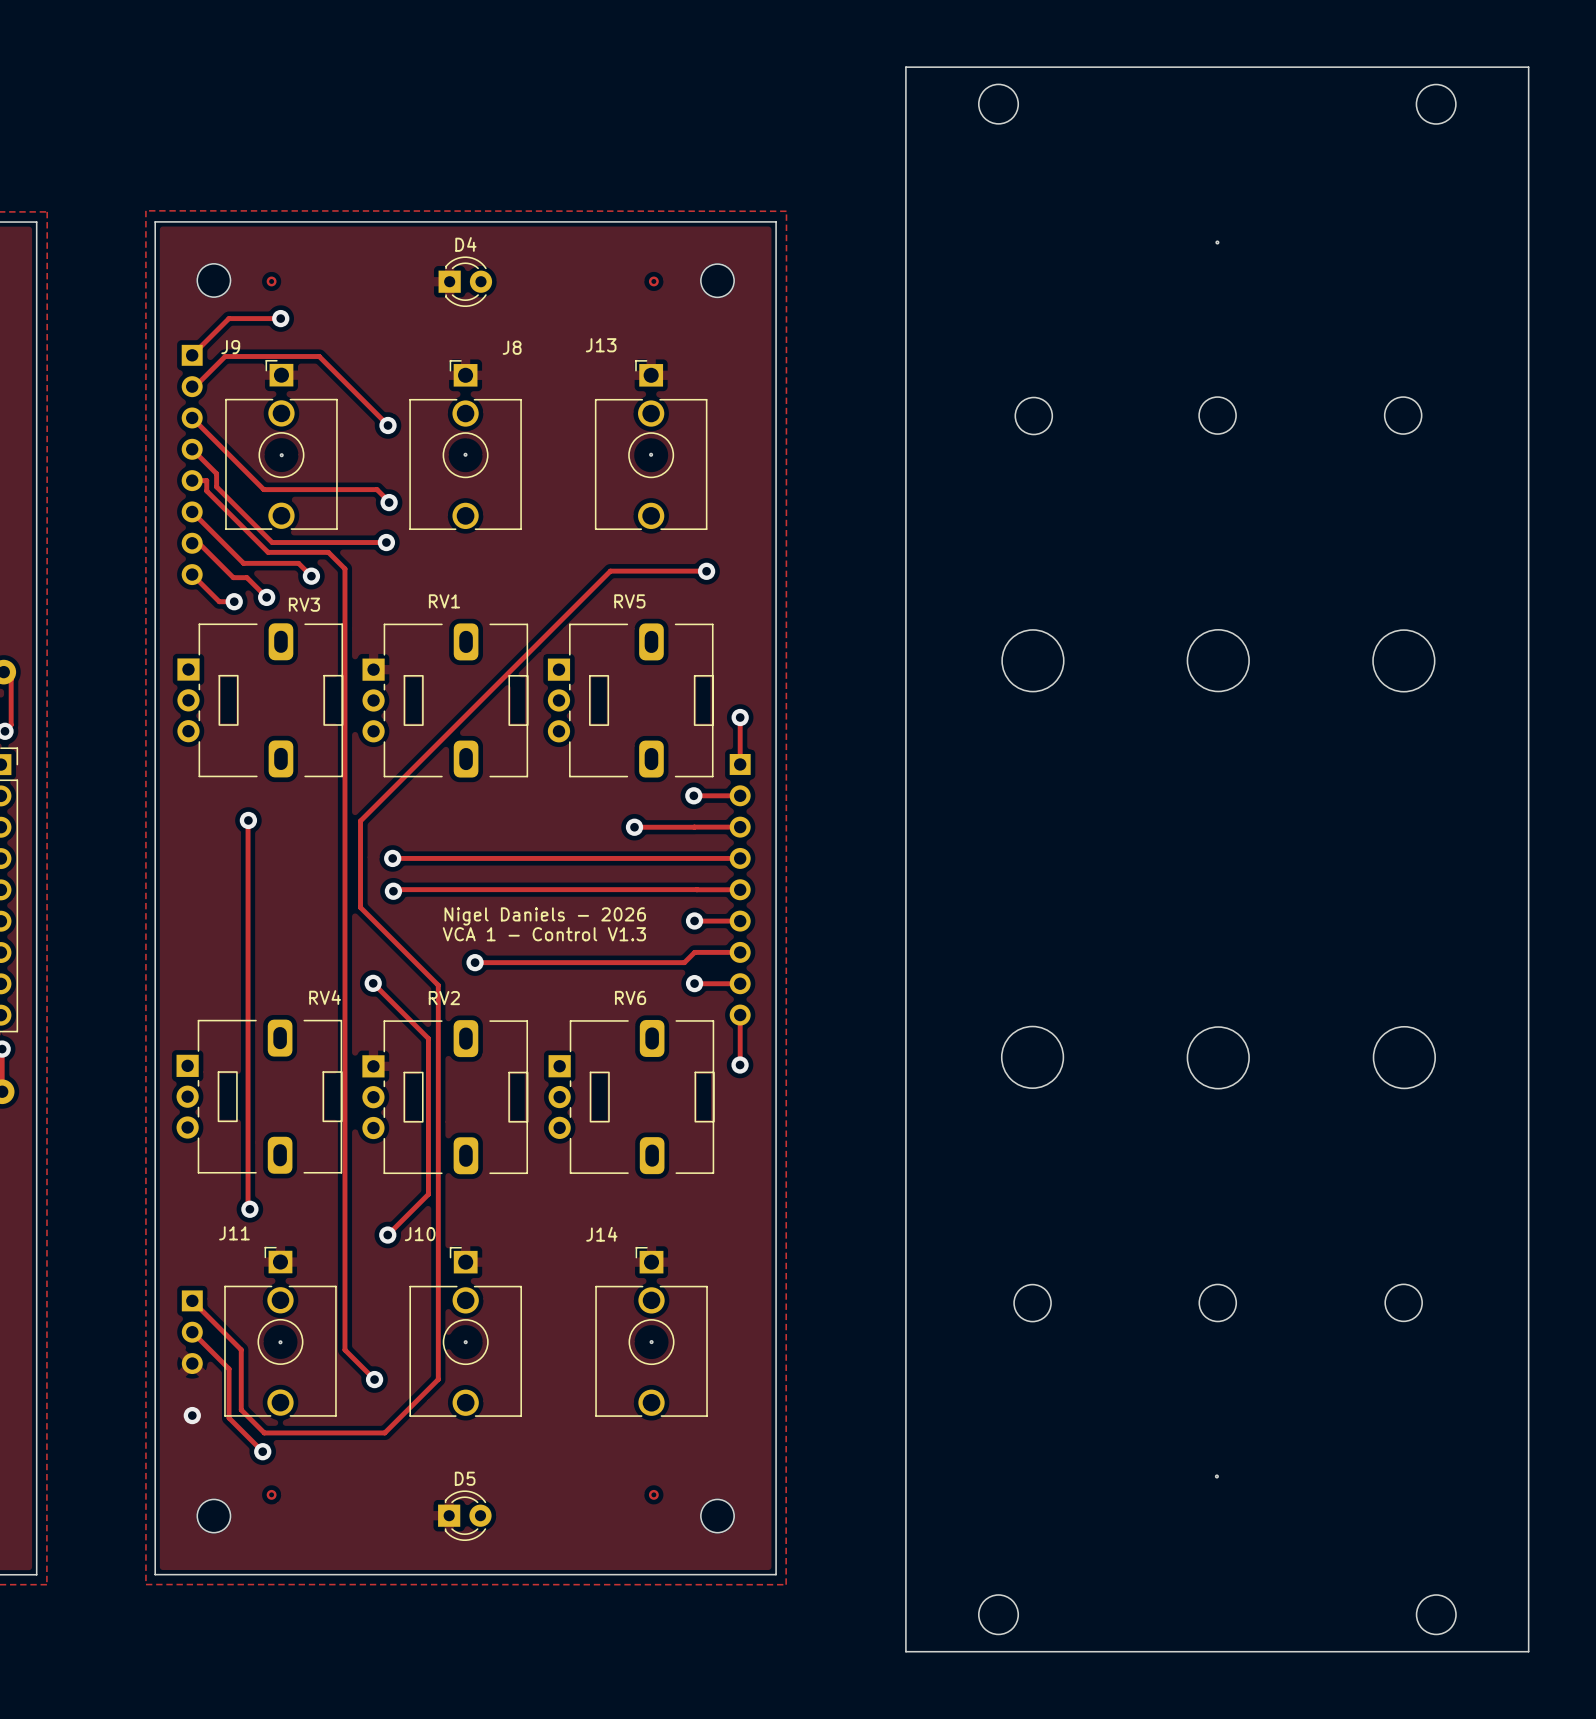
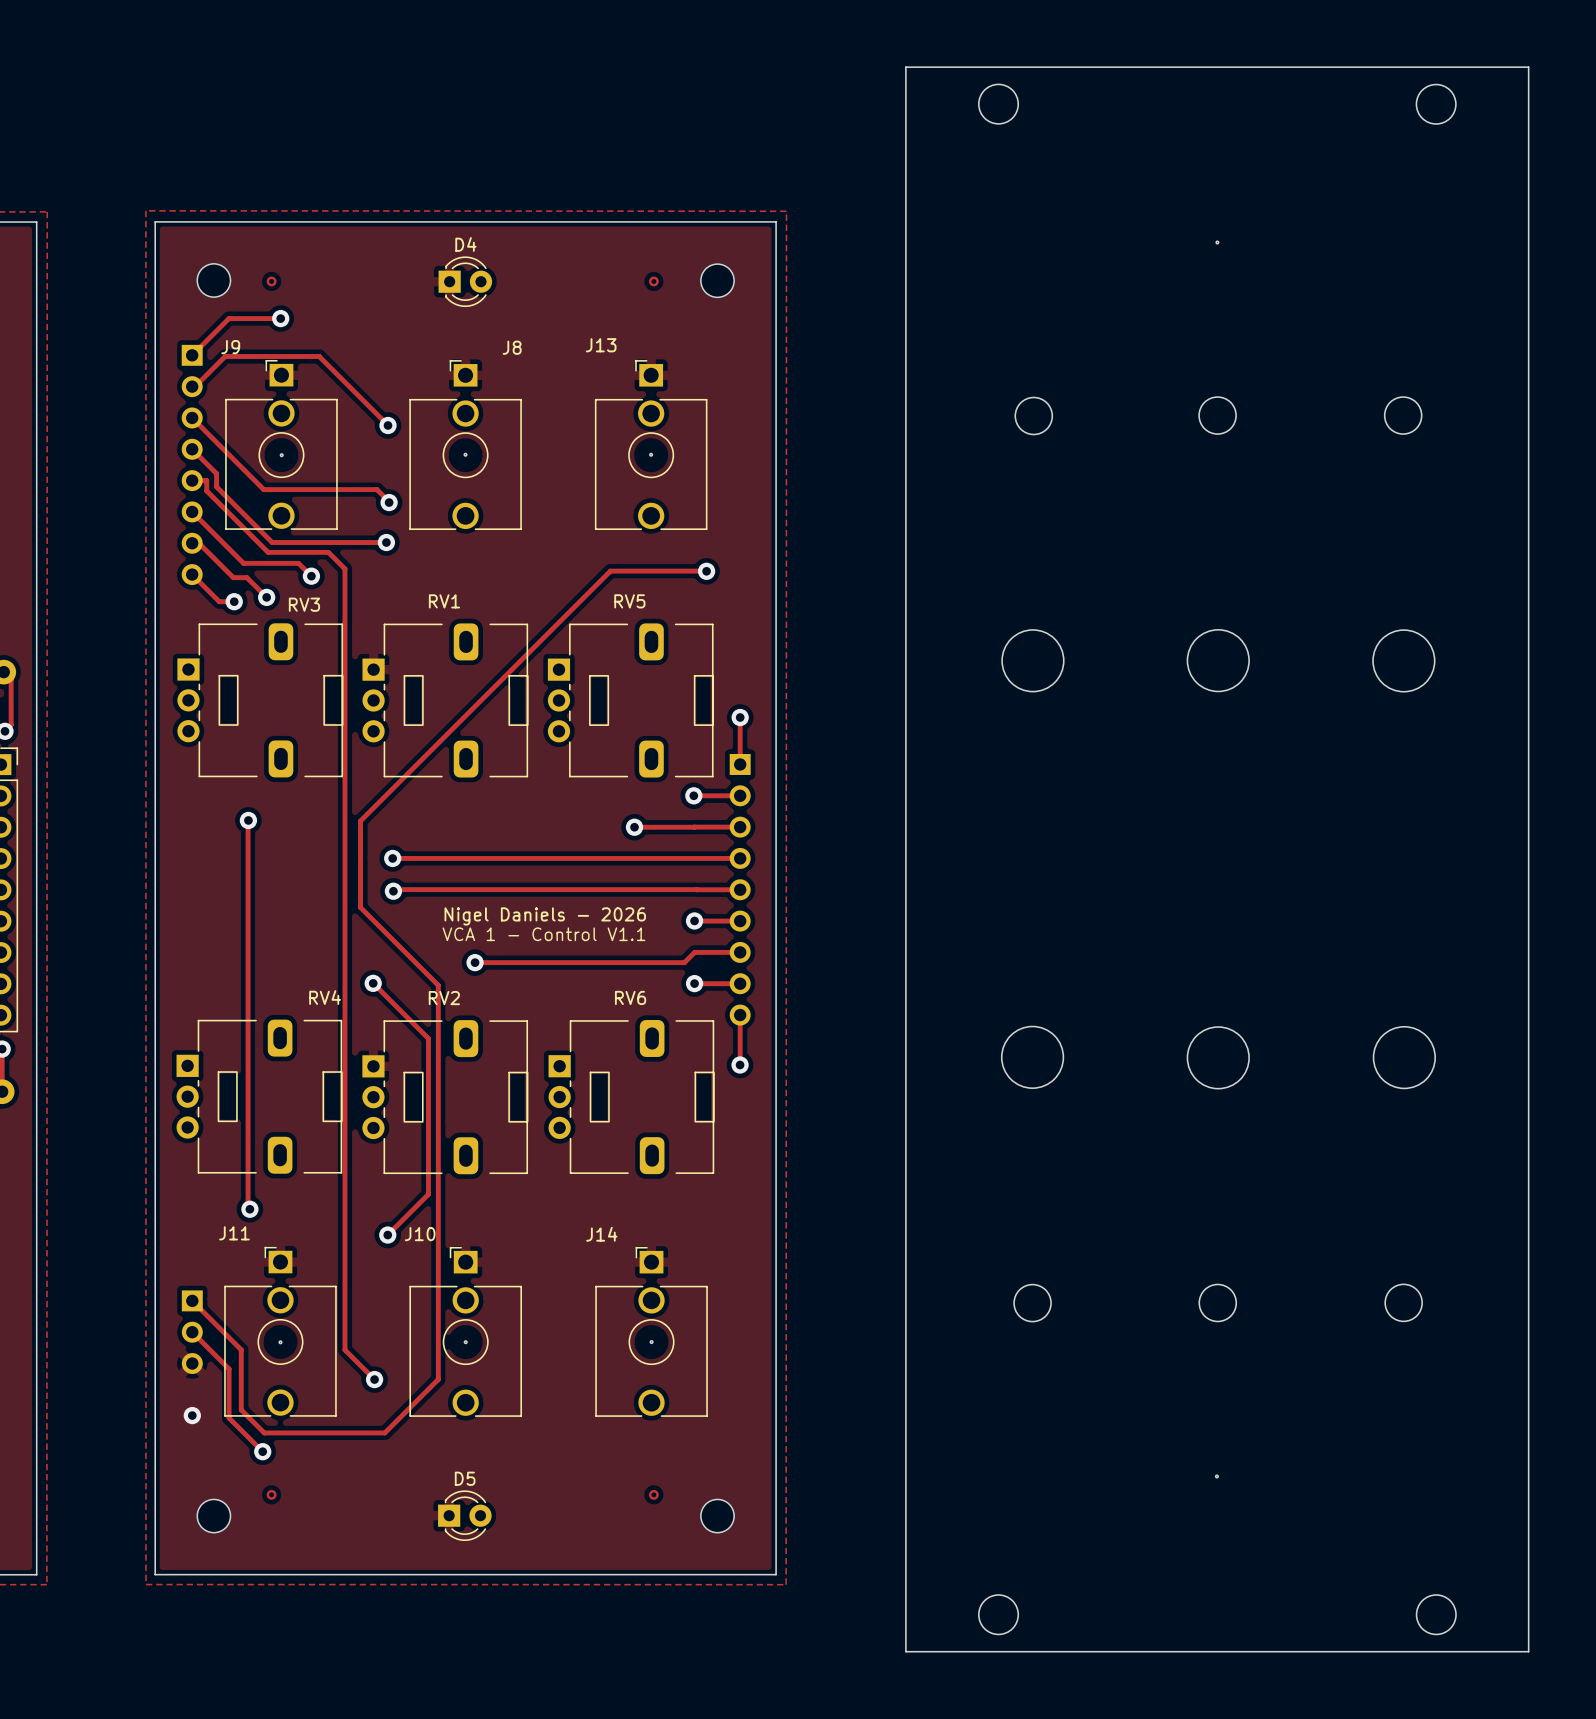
text: VCA 1 - Control V1.3 (544, 934) -> VCA 1 - Control V1.1 (543, 934)

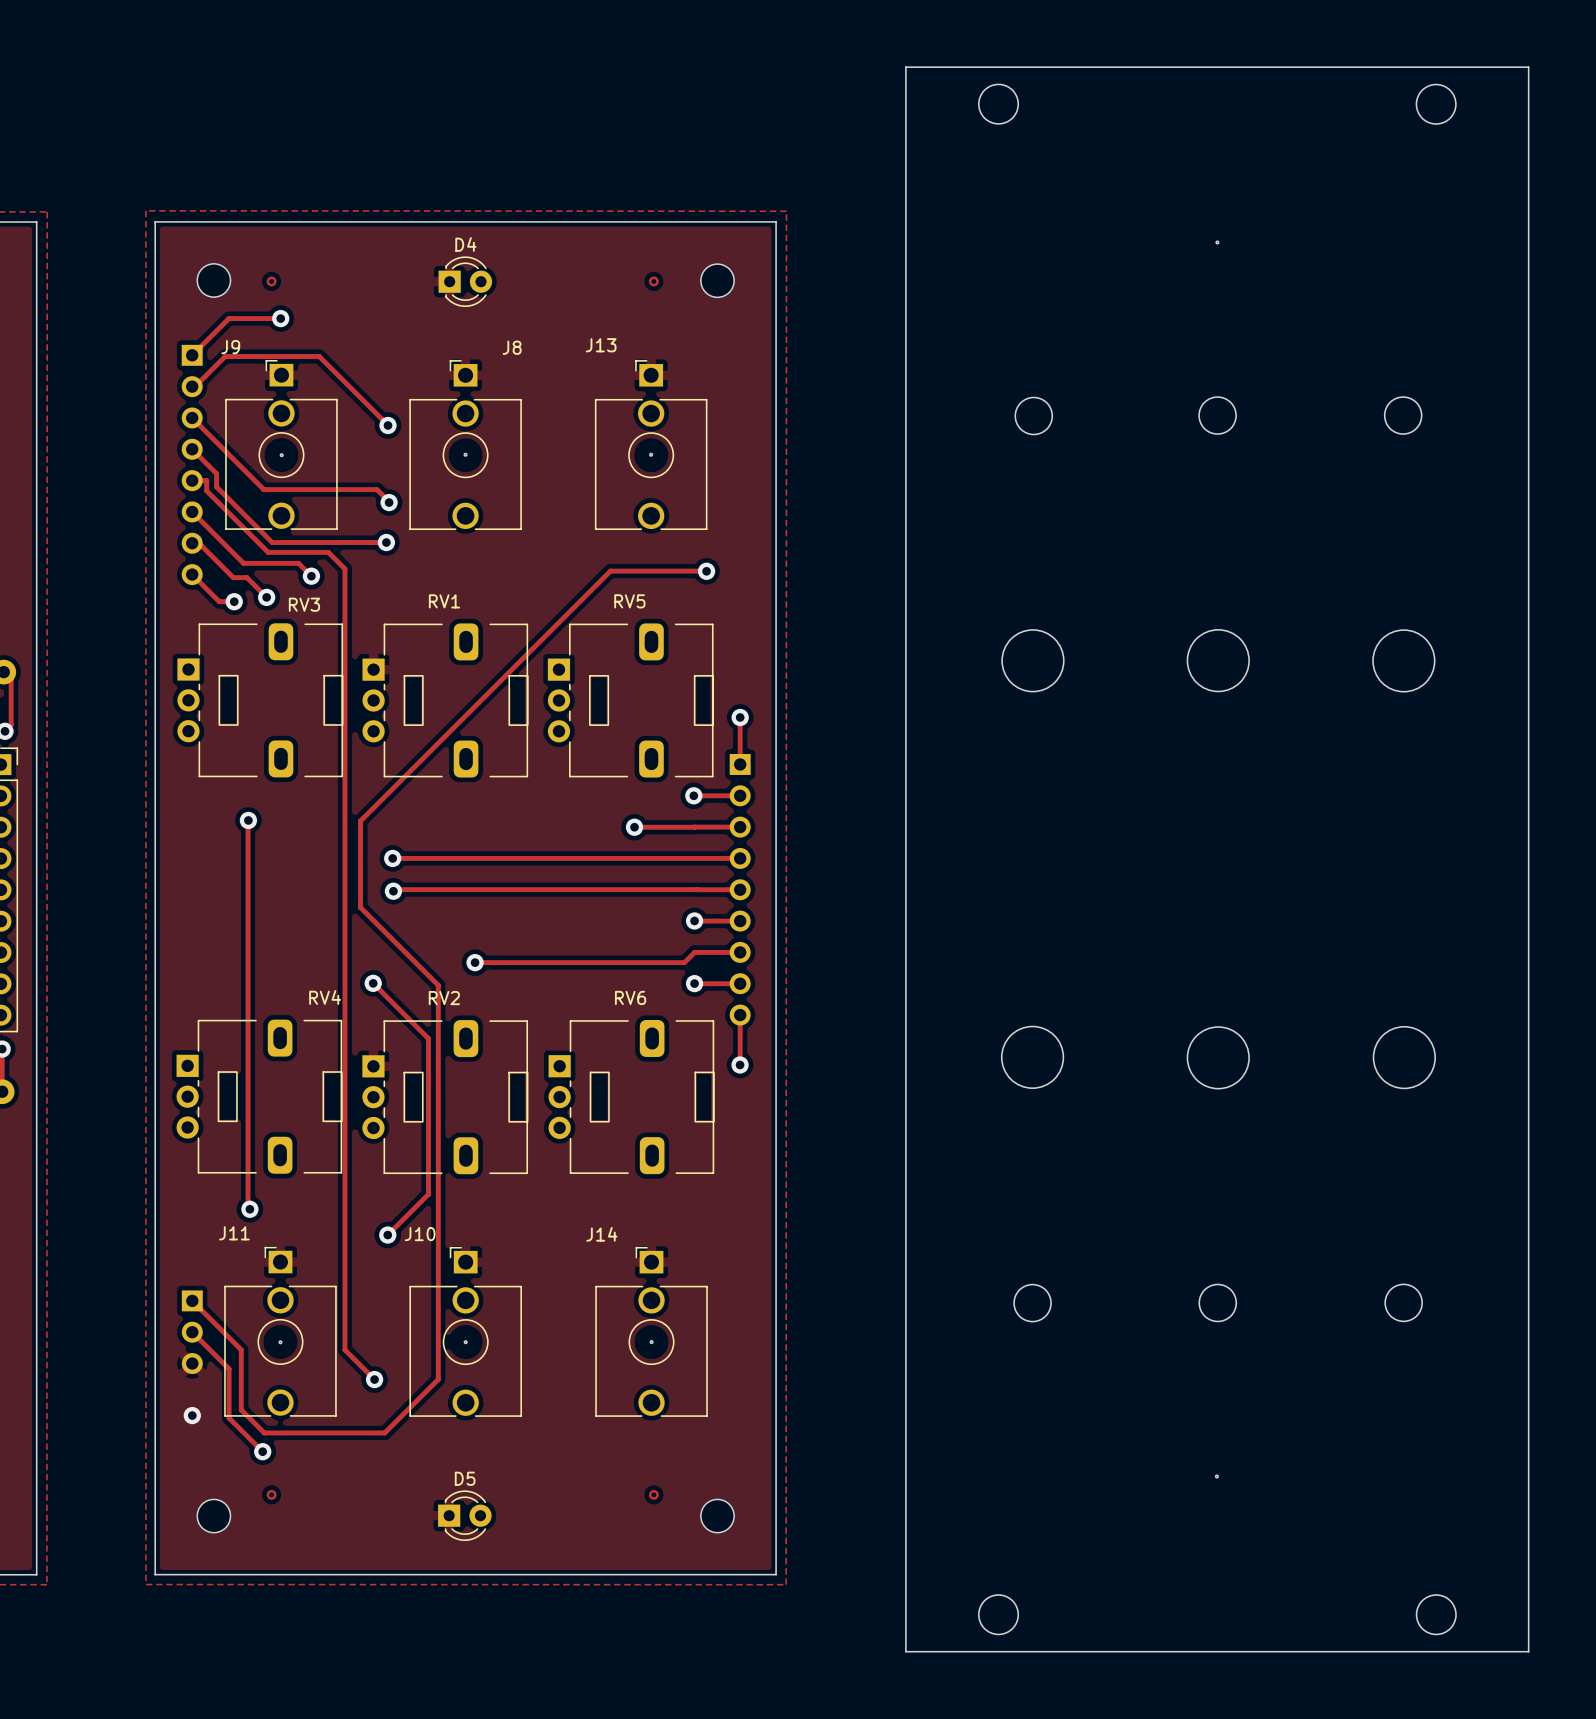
text: Nigel Daniels - 2026 (545, 916) -> none
text: VCA 1 - Control V1.1 (543, 934) -> none

